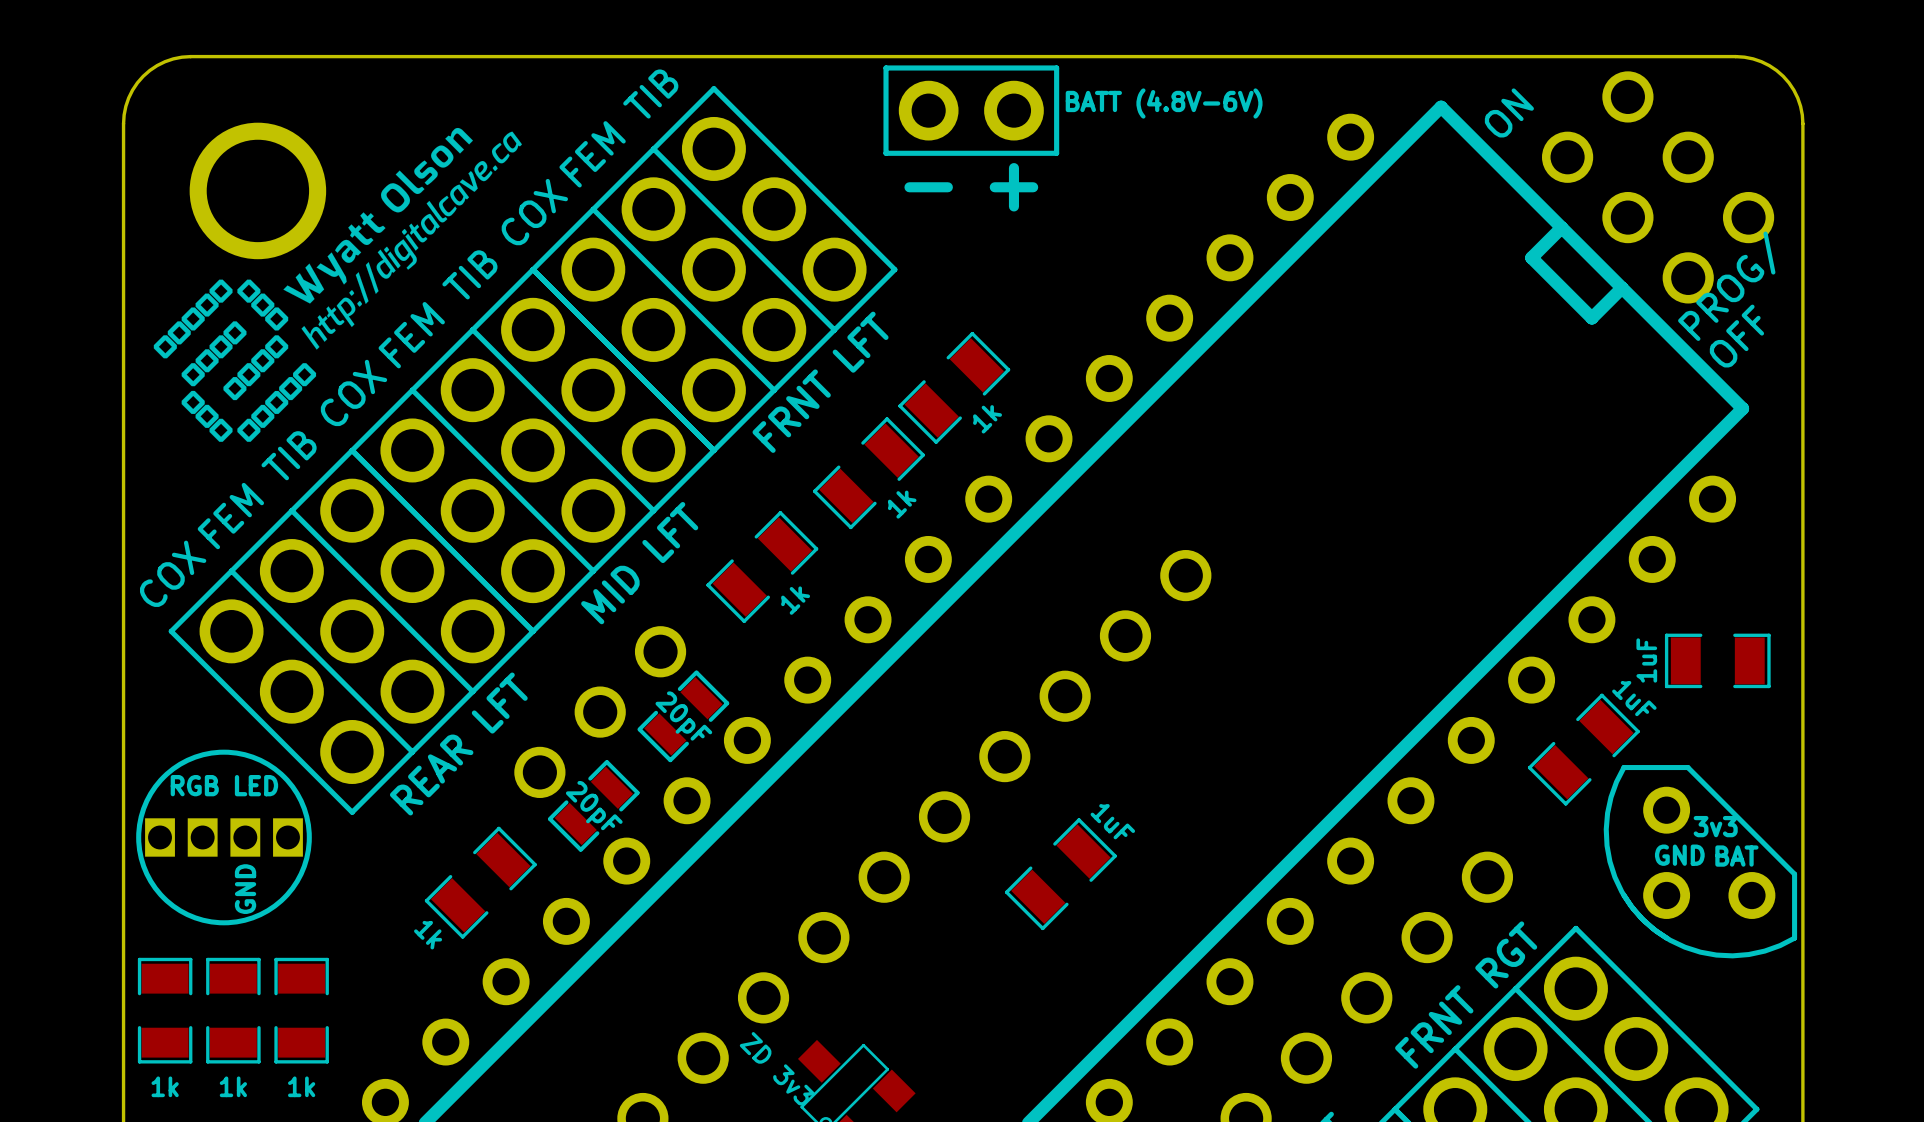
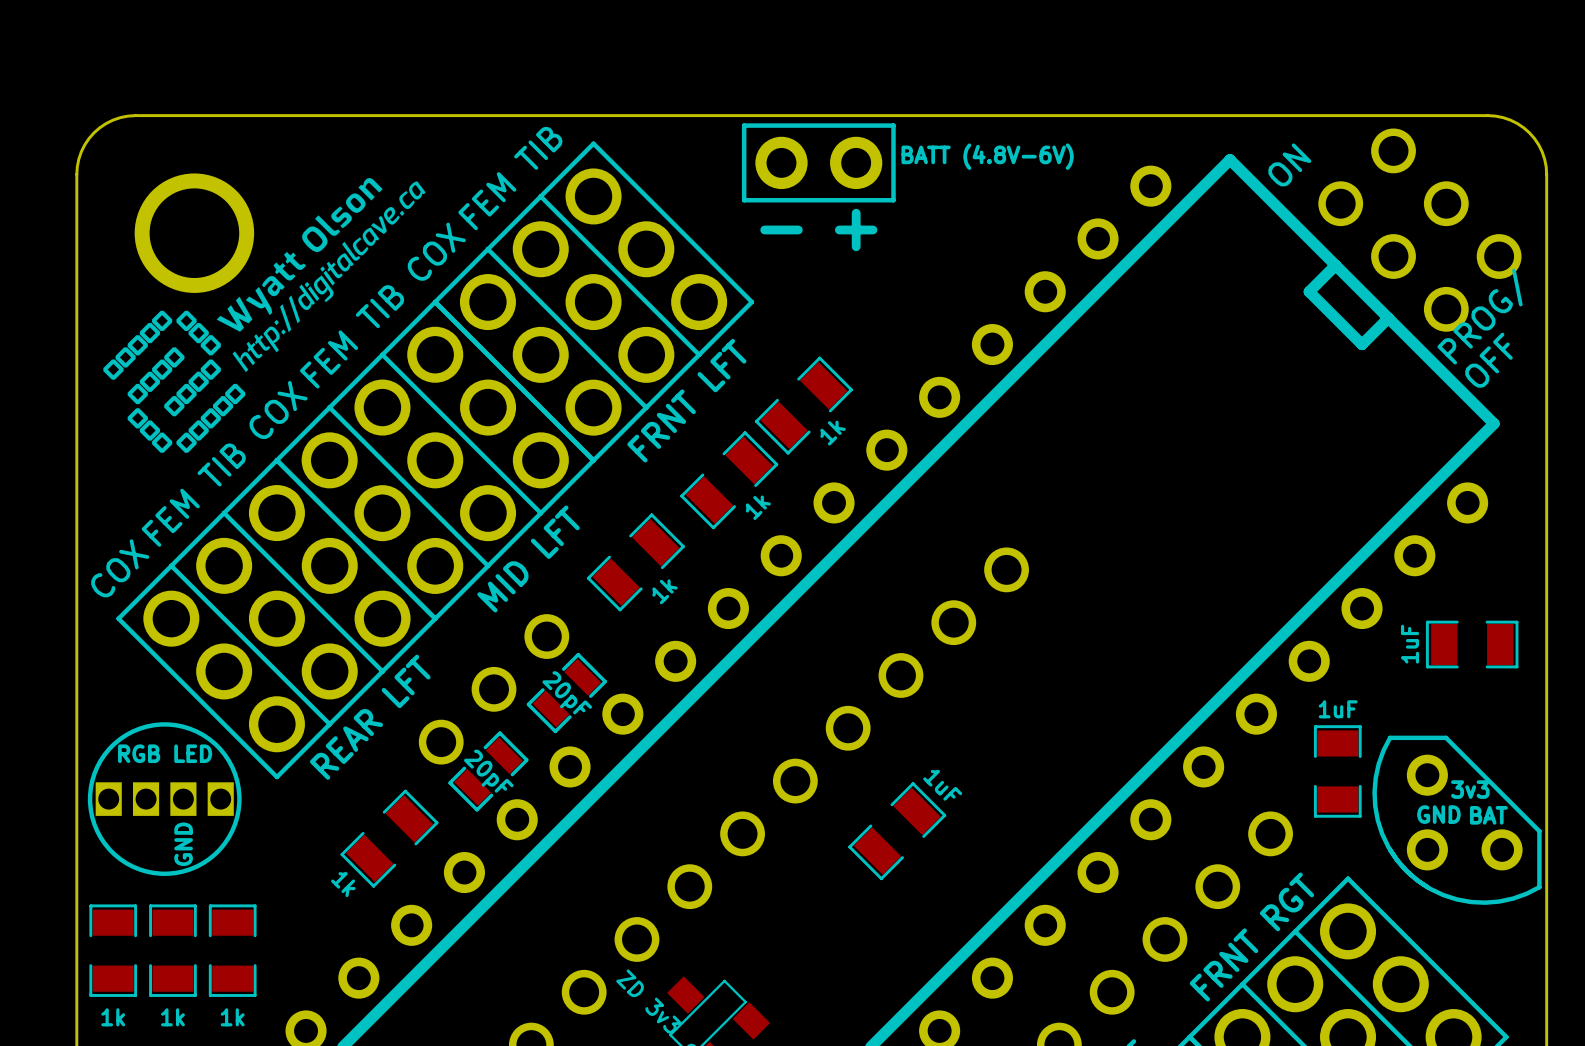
part: 1uF (1583, 749) -> none
part: none -> 1uF (1337, 771)

